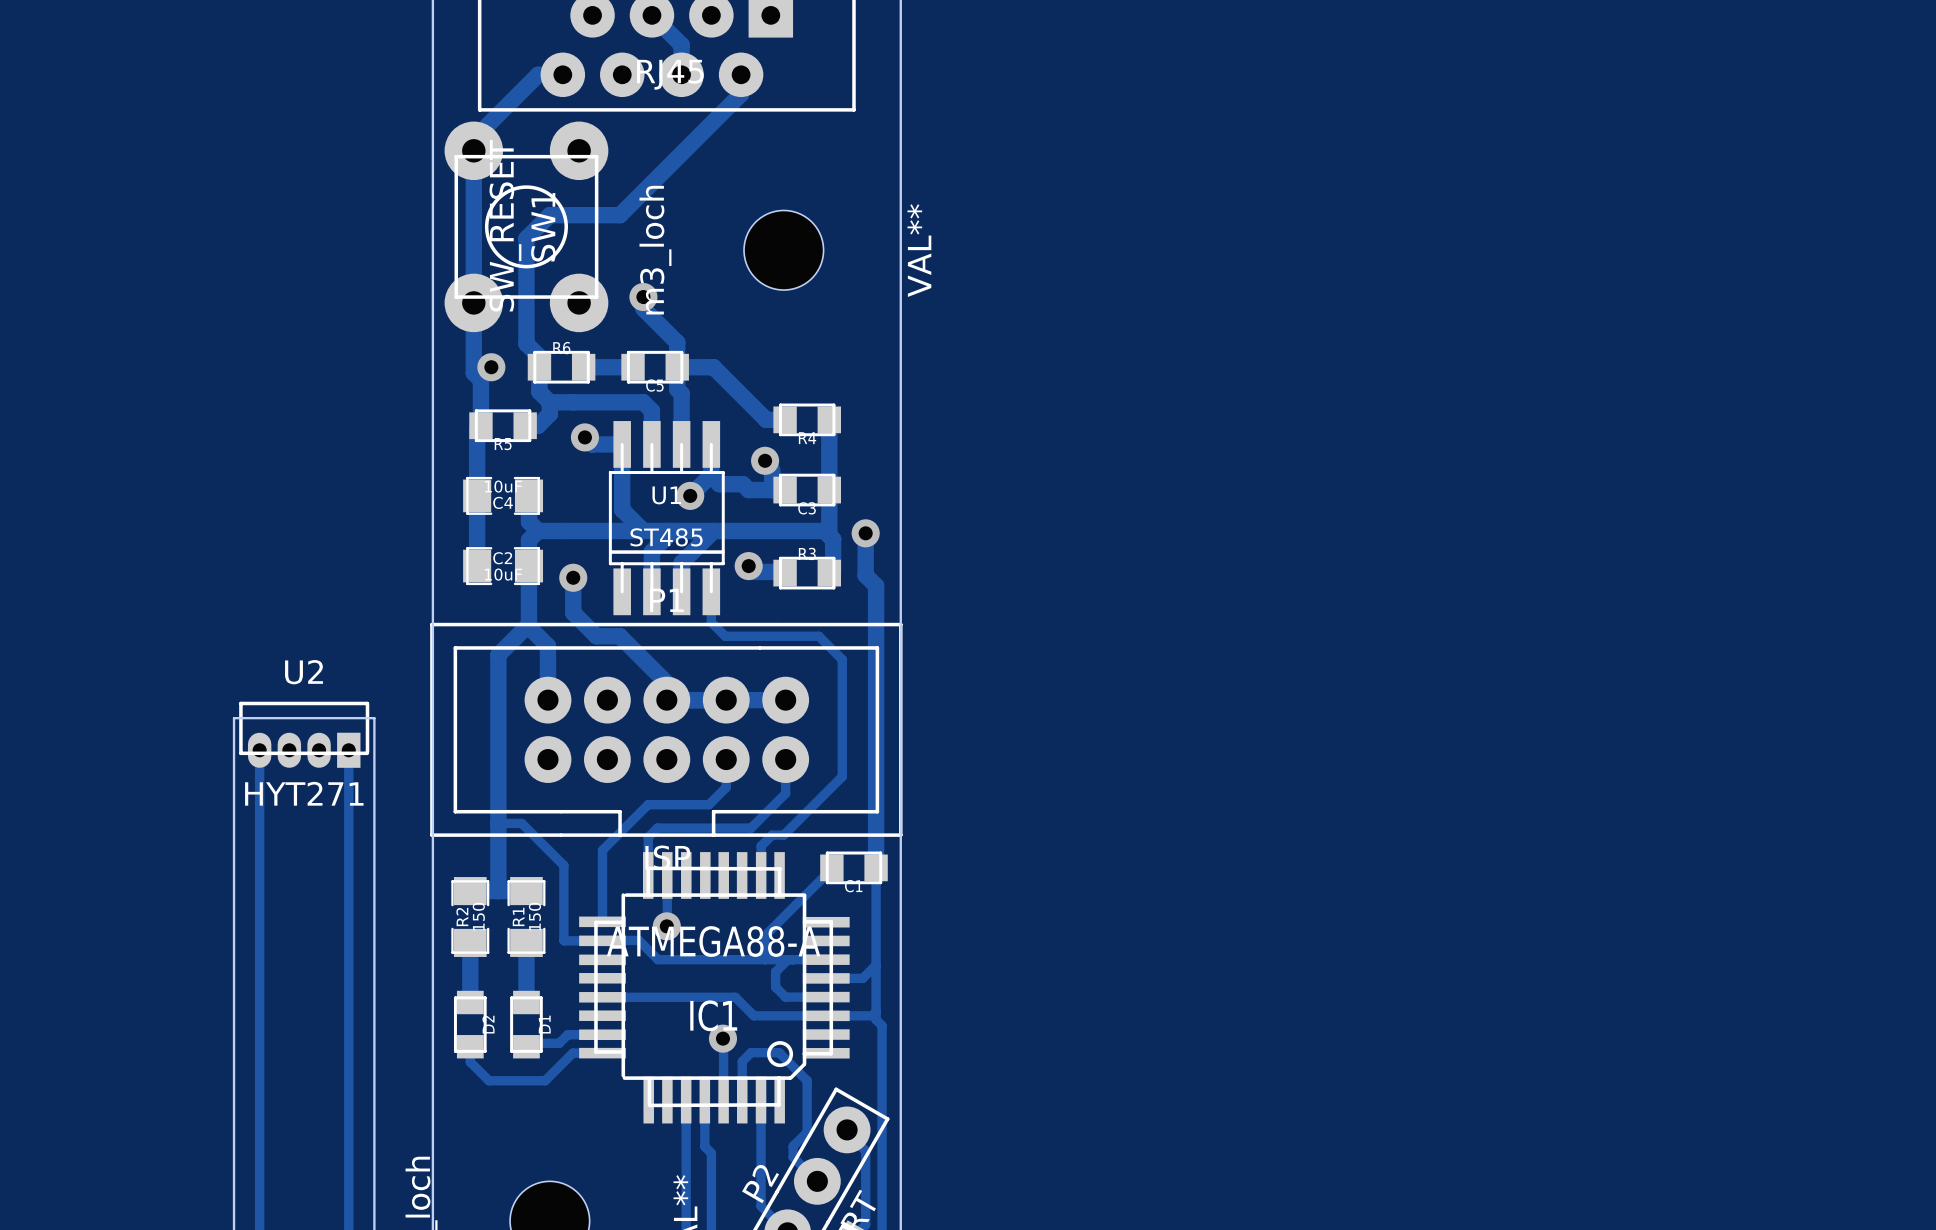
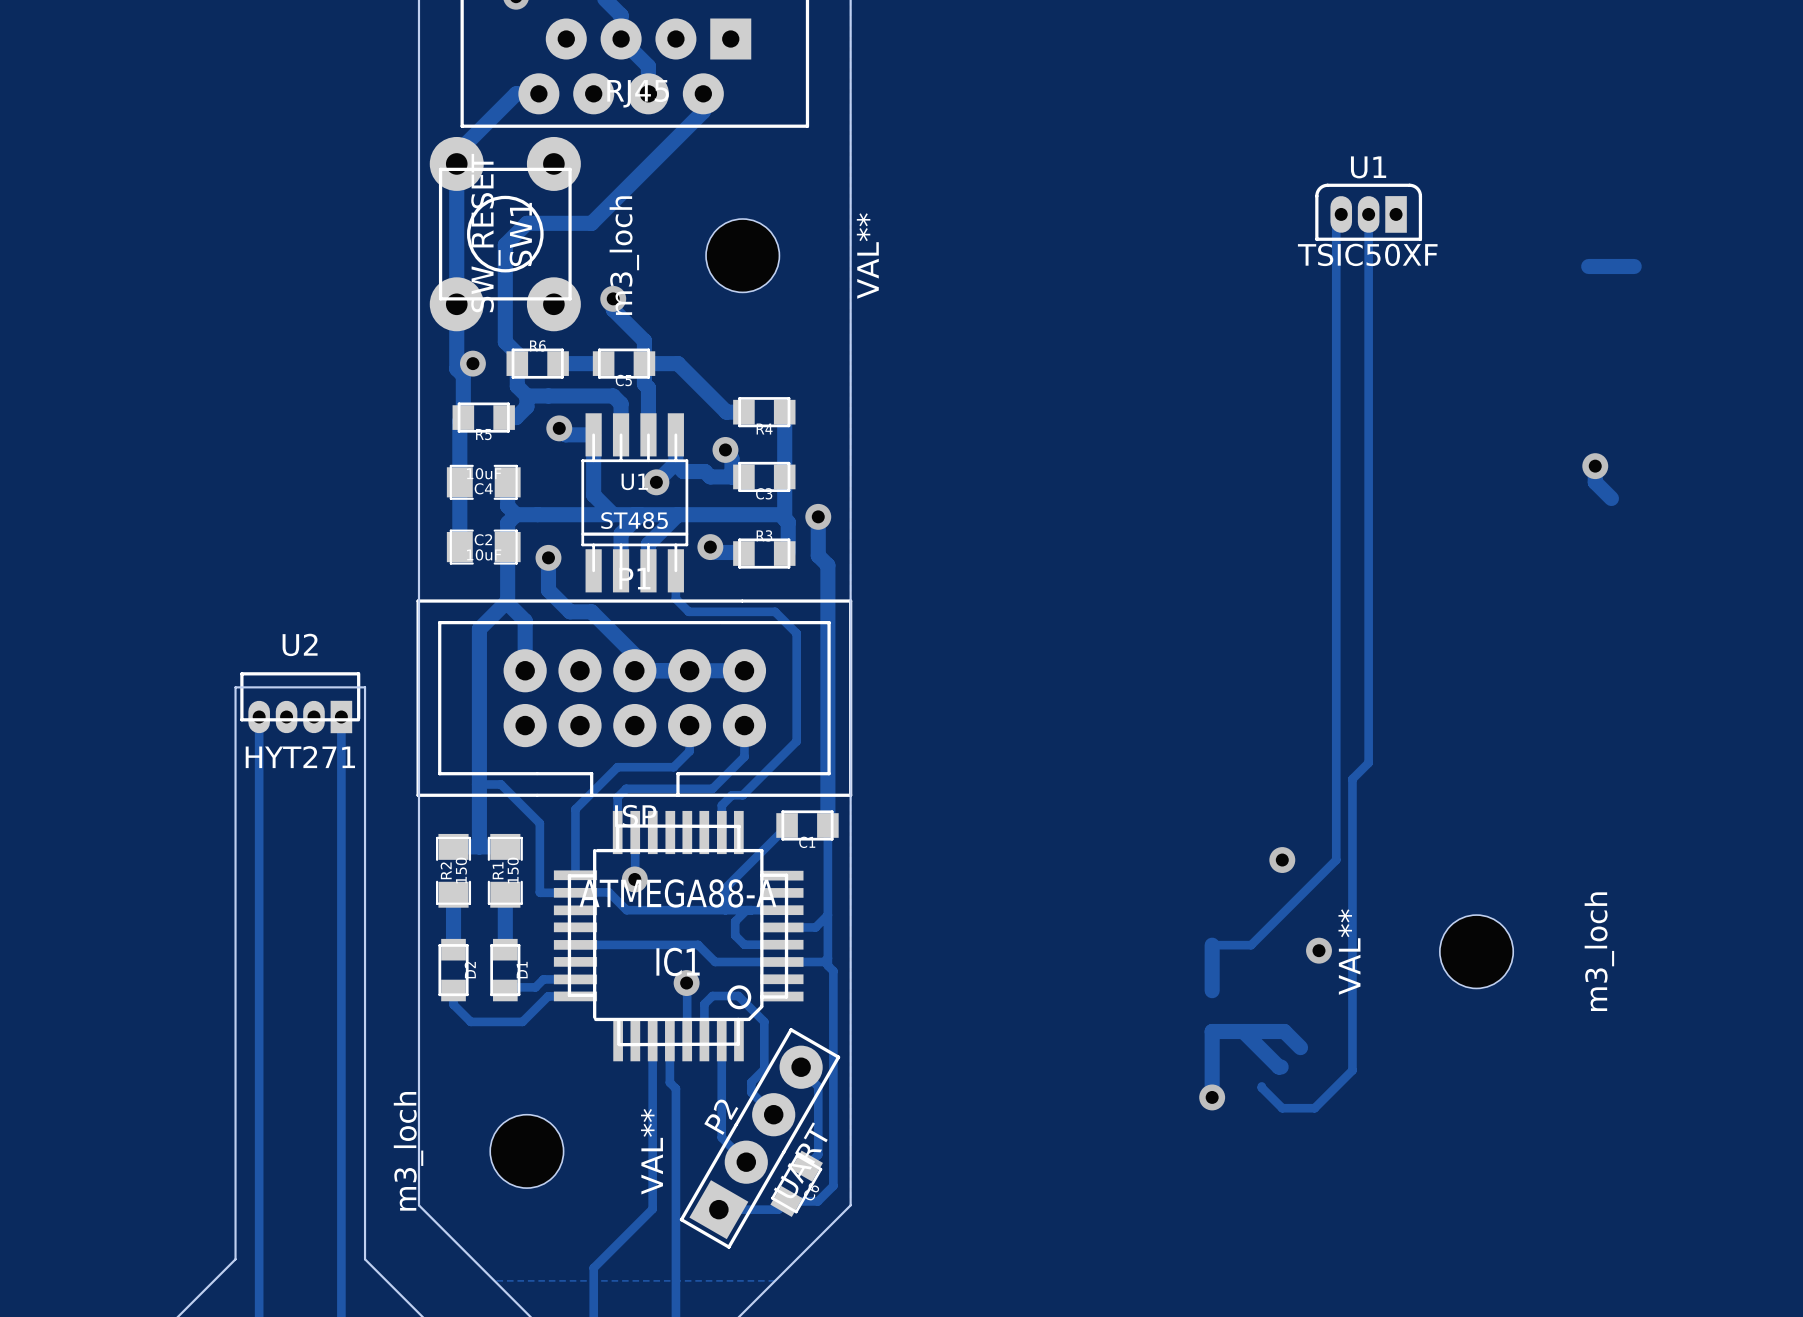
track: none -> (1368, 210) (1368, 762) (1352, 779) (1352, 1070) (1314, 1108) (1282, 1108) (1261, 1086)
U1: none -> TSIC50XF (1368, 212)
track: none -> (1341, 214) (1336, 219) (1336, 860) (1251, 945) (1212, 945) (1212, 990)
track: none -> (1588, 266) (1634, 266)
track: none -> (1595, 466) (1595, 482) (1611, 498)
via: none -> (1595, 466)
via: none -> (1282, 860)
via: none -> (1319, 950)
m3_loch: none -> VAL** (1476, 951)
track: none -> (1243, 1031) (1278, 1067) (1281, 1067)
track: none -> (1300, 1047) (1284, 1031) (1212, 1031) (1212, 1097)
via: none -> (1212, 1097)

